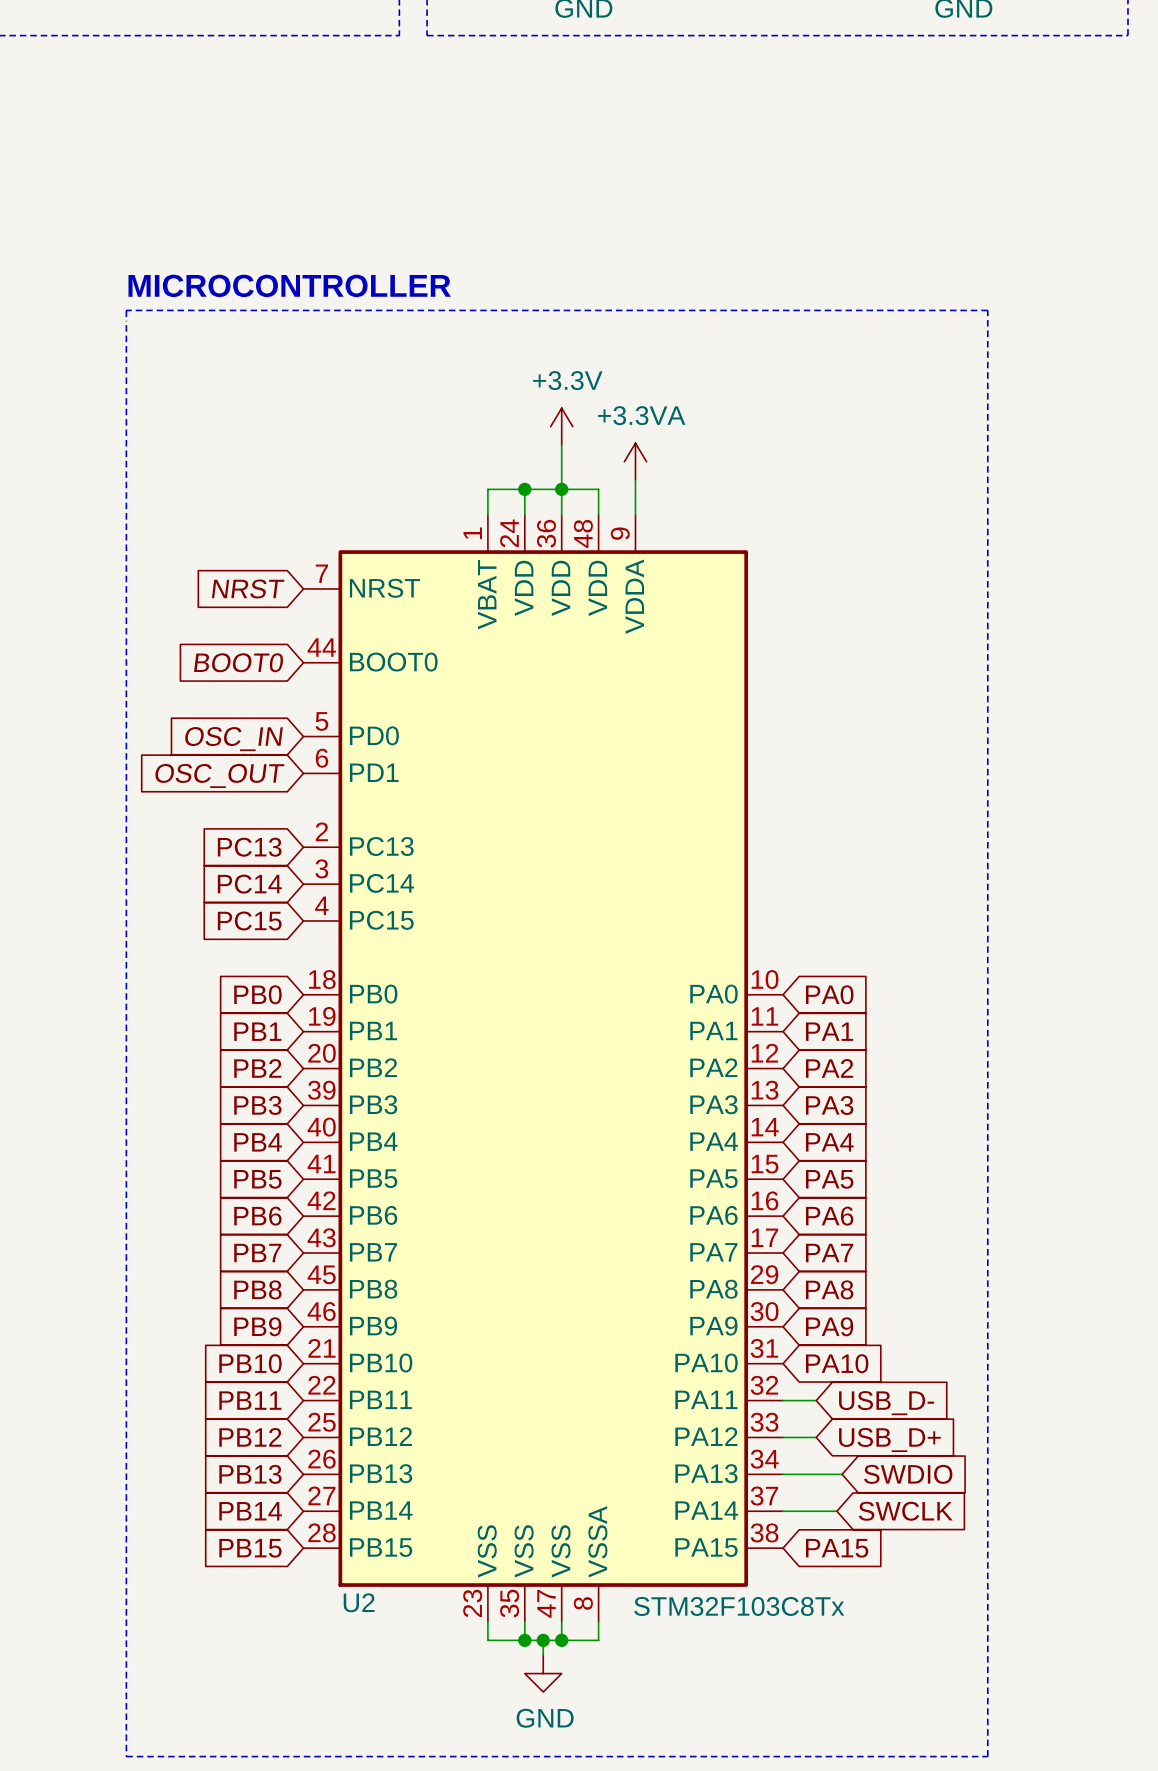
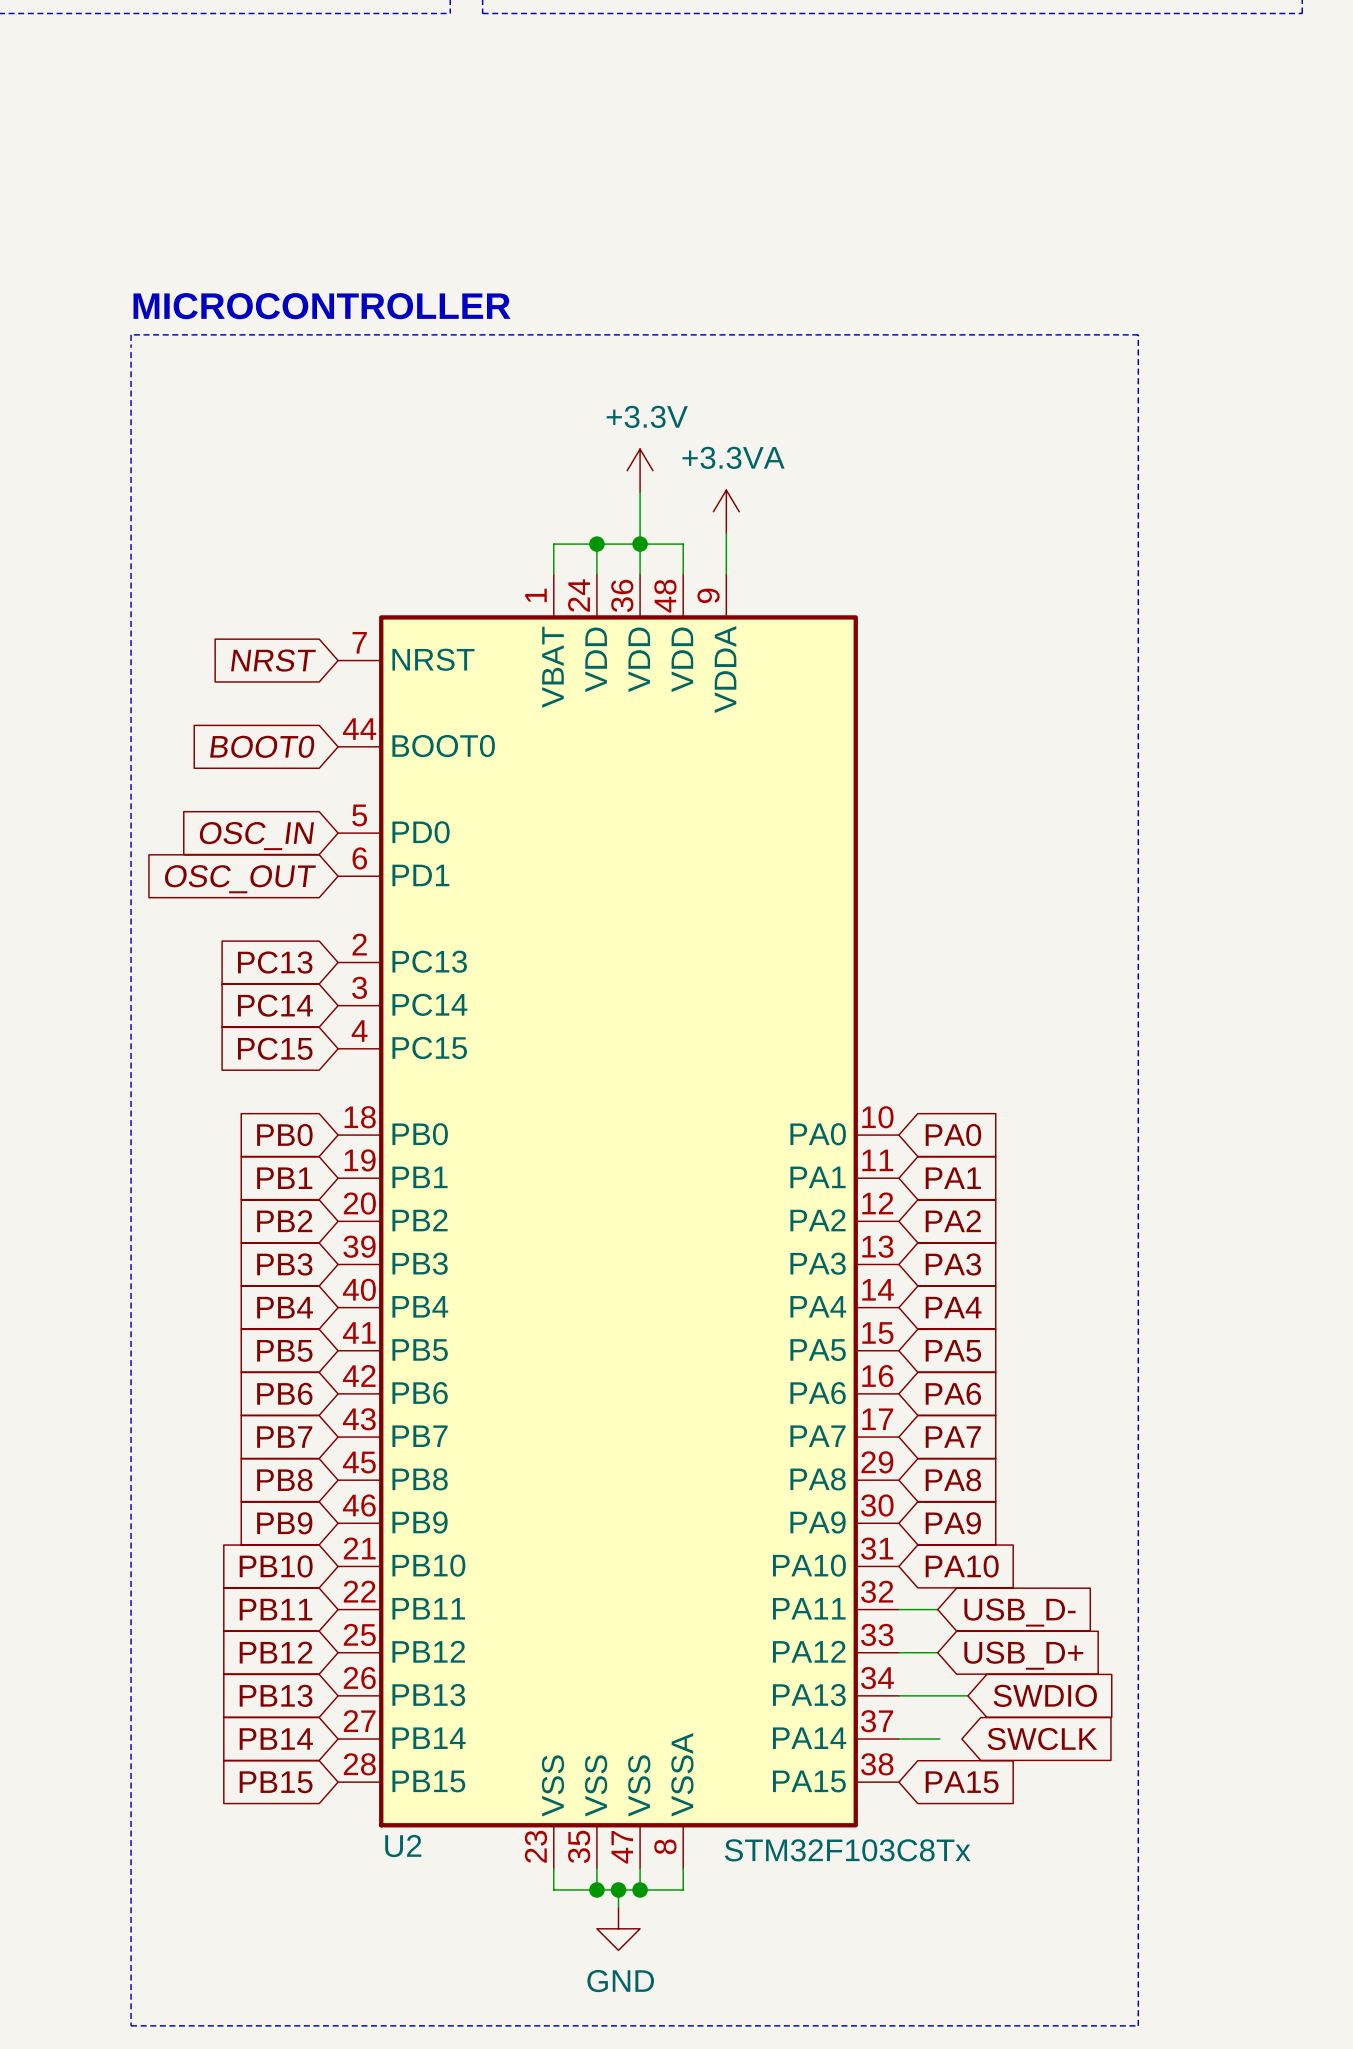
wire: (818, 1511) (836, 1511) -> none

